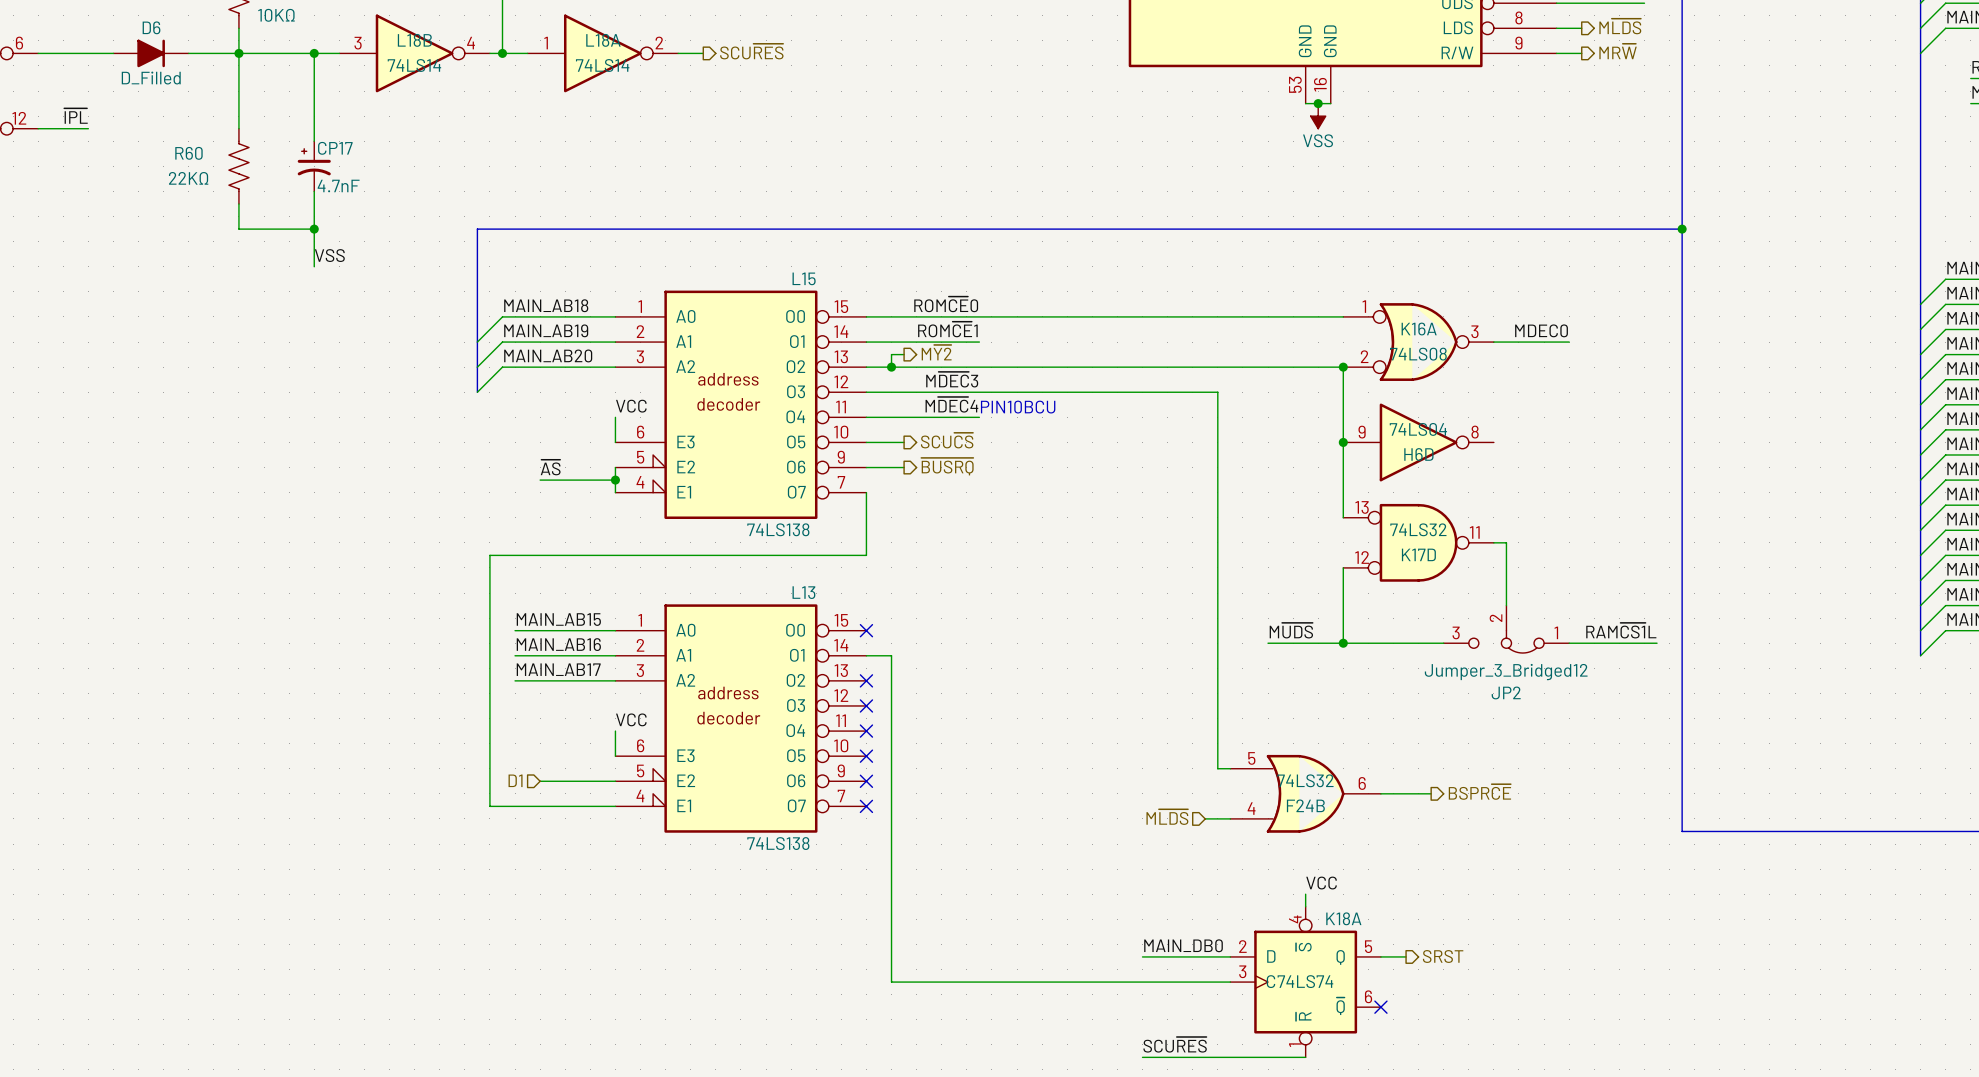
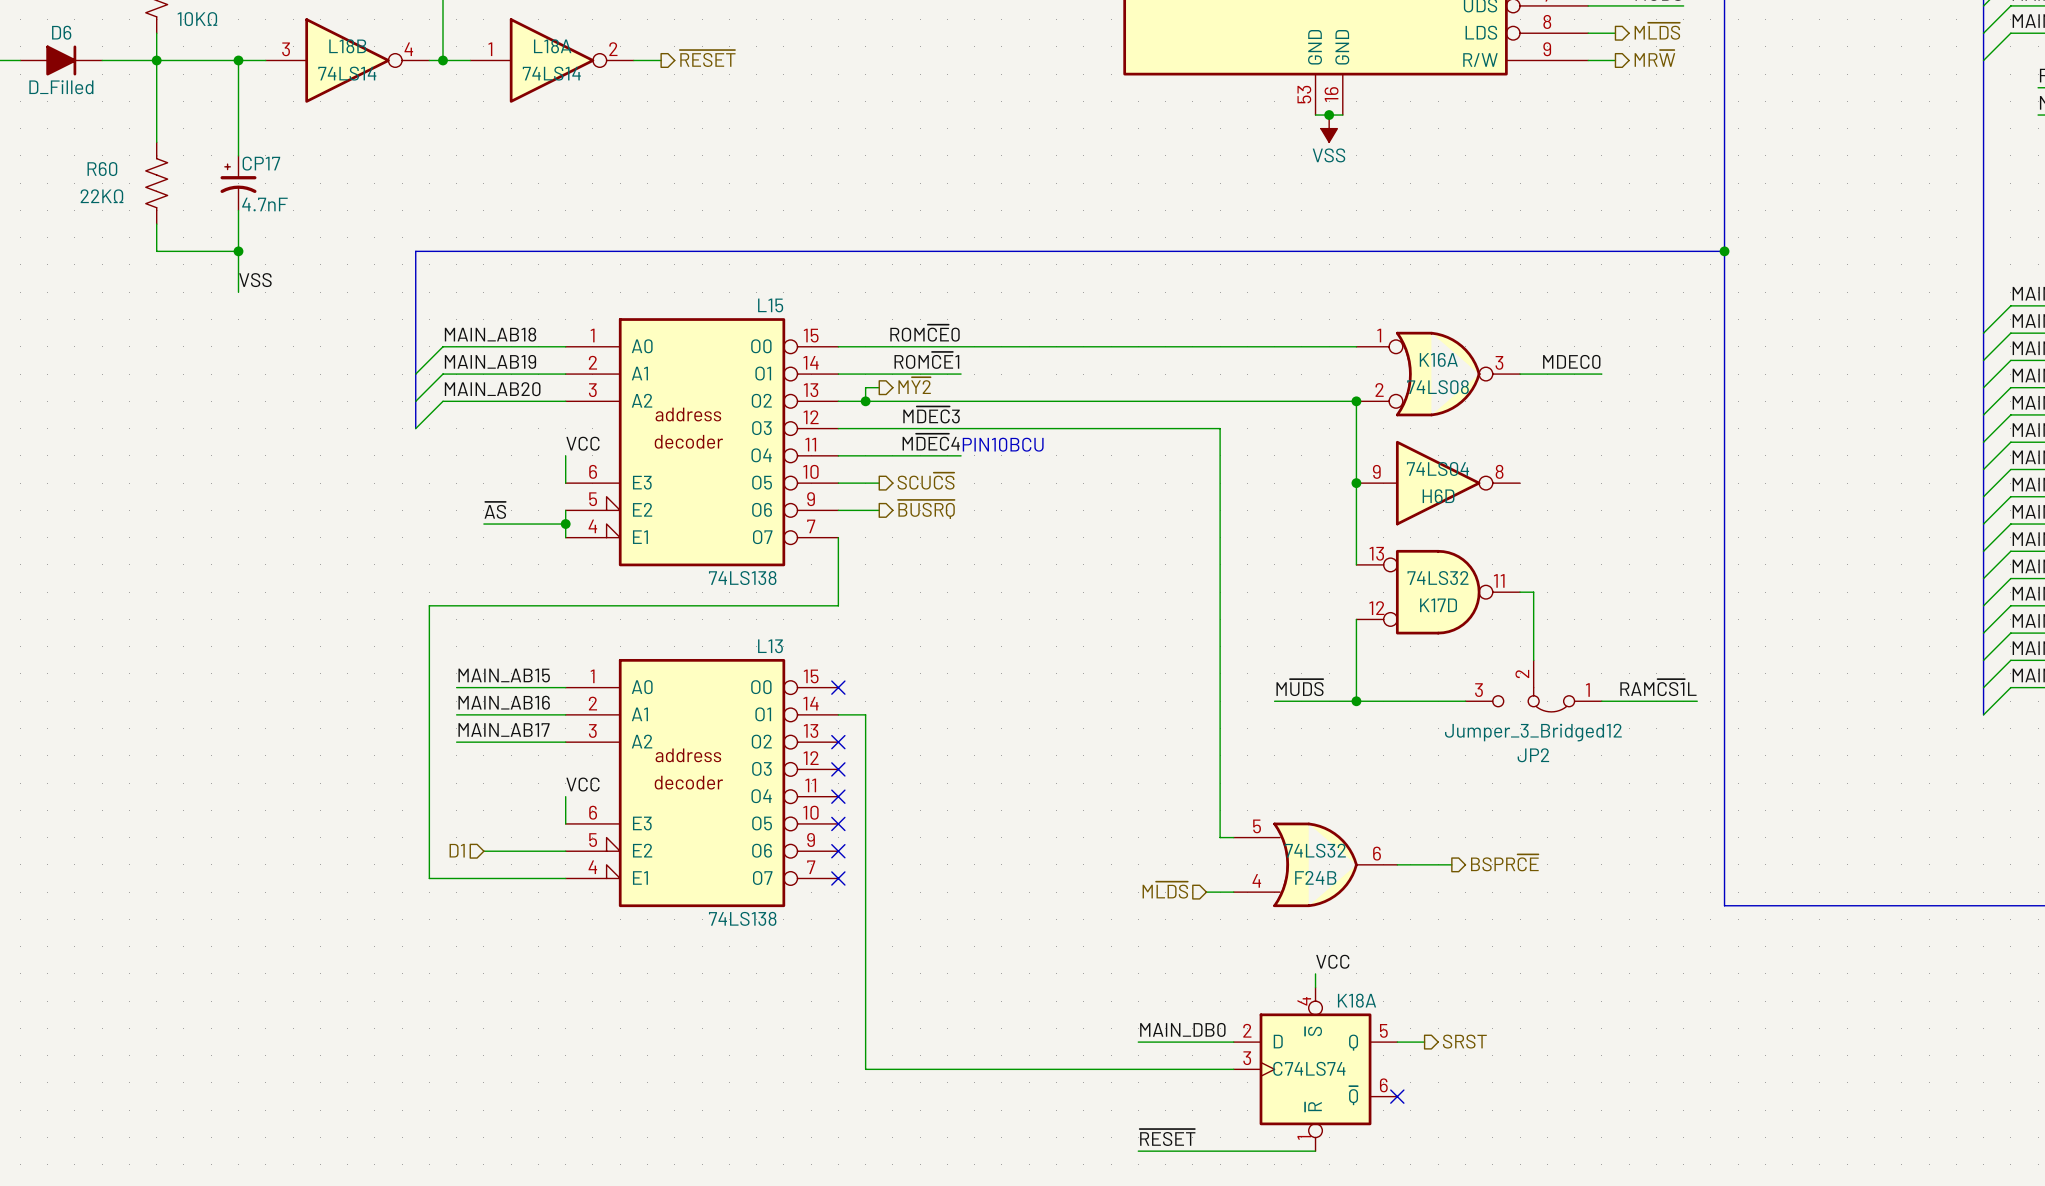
hierarchical label: SCU~{RES} (751, 51) -> ~{RESET} (707, 58)
label: SCU~{RES} (1175, 1044) -> ~{RESET} (1167, 1137)

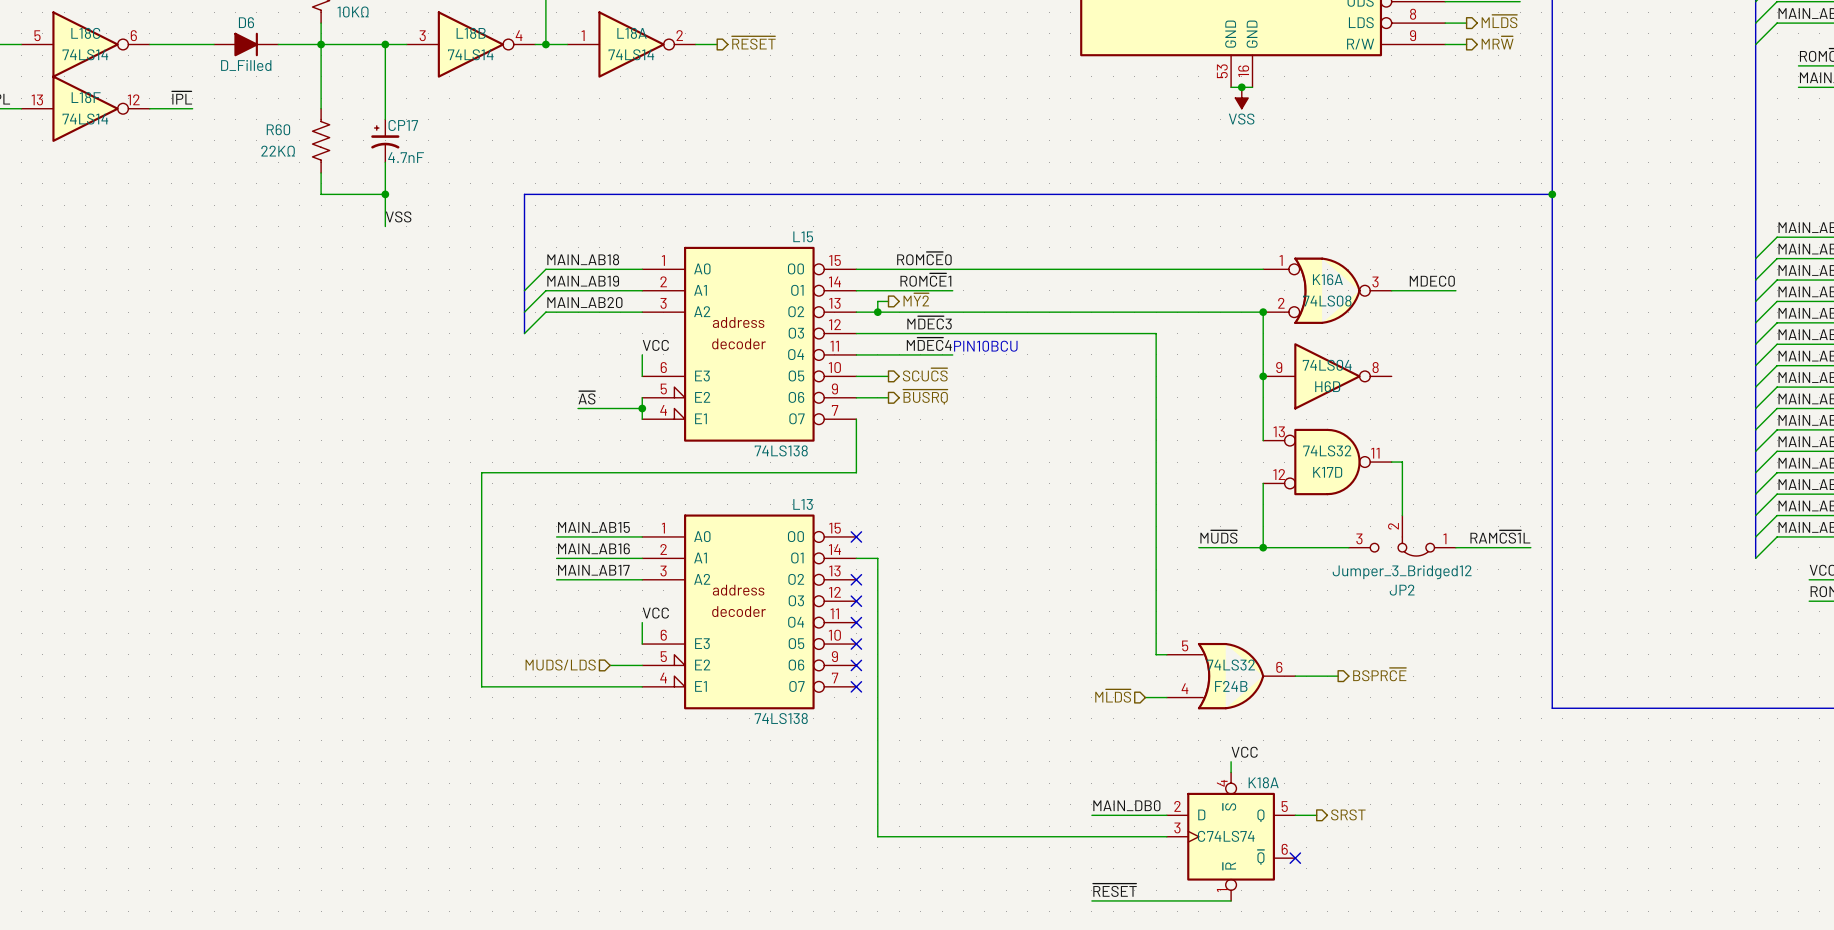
wire: (429, 605) (429, 878) -> (535, 472) (481, 472) (481, 686) (535, 686)
hierarchical label: D1 (457, 850) -> none
hierarchical label: none -> MUDS/LDS (560, 665)
wire: (483, 851) (524, 851) -> none

